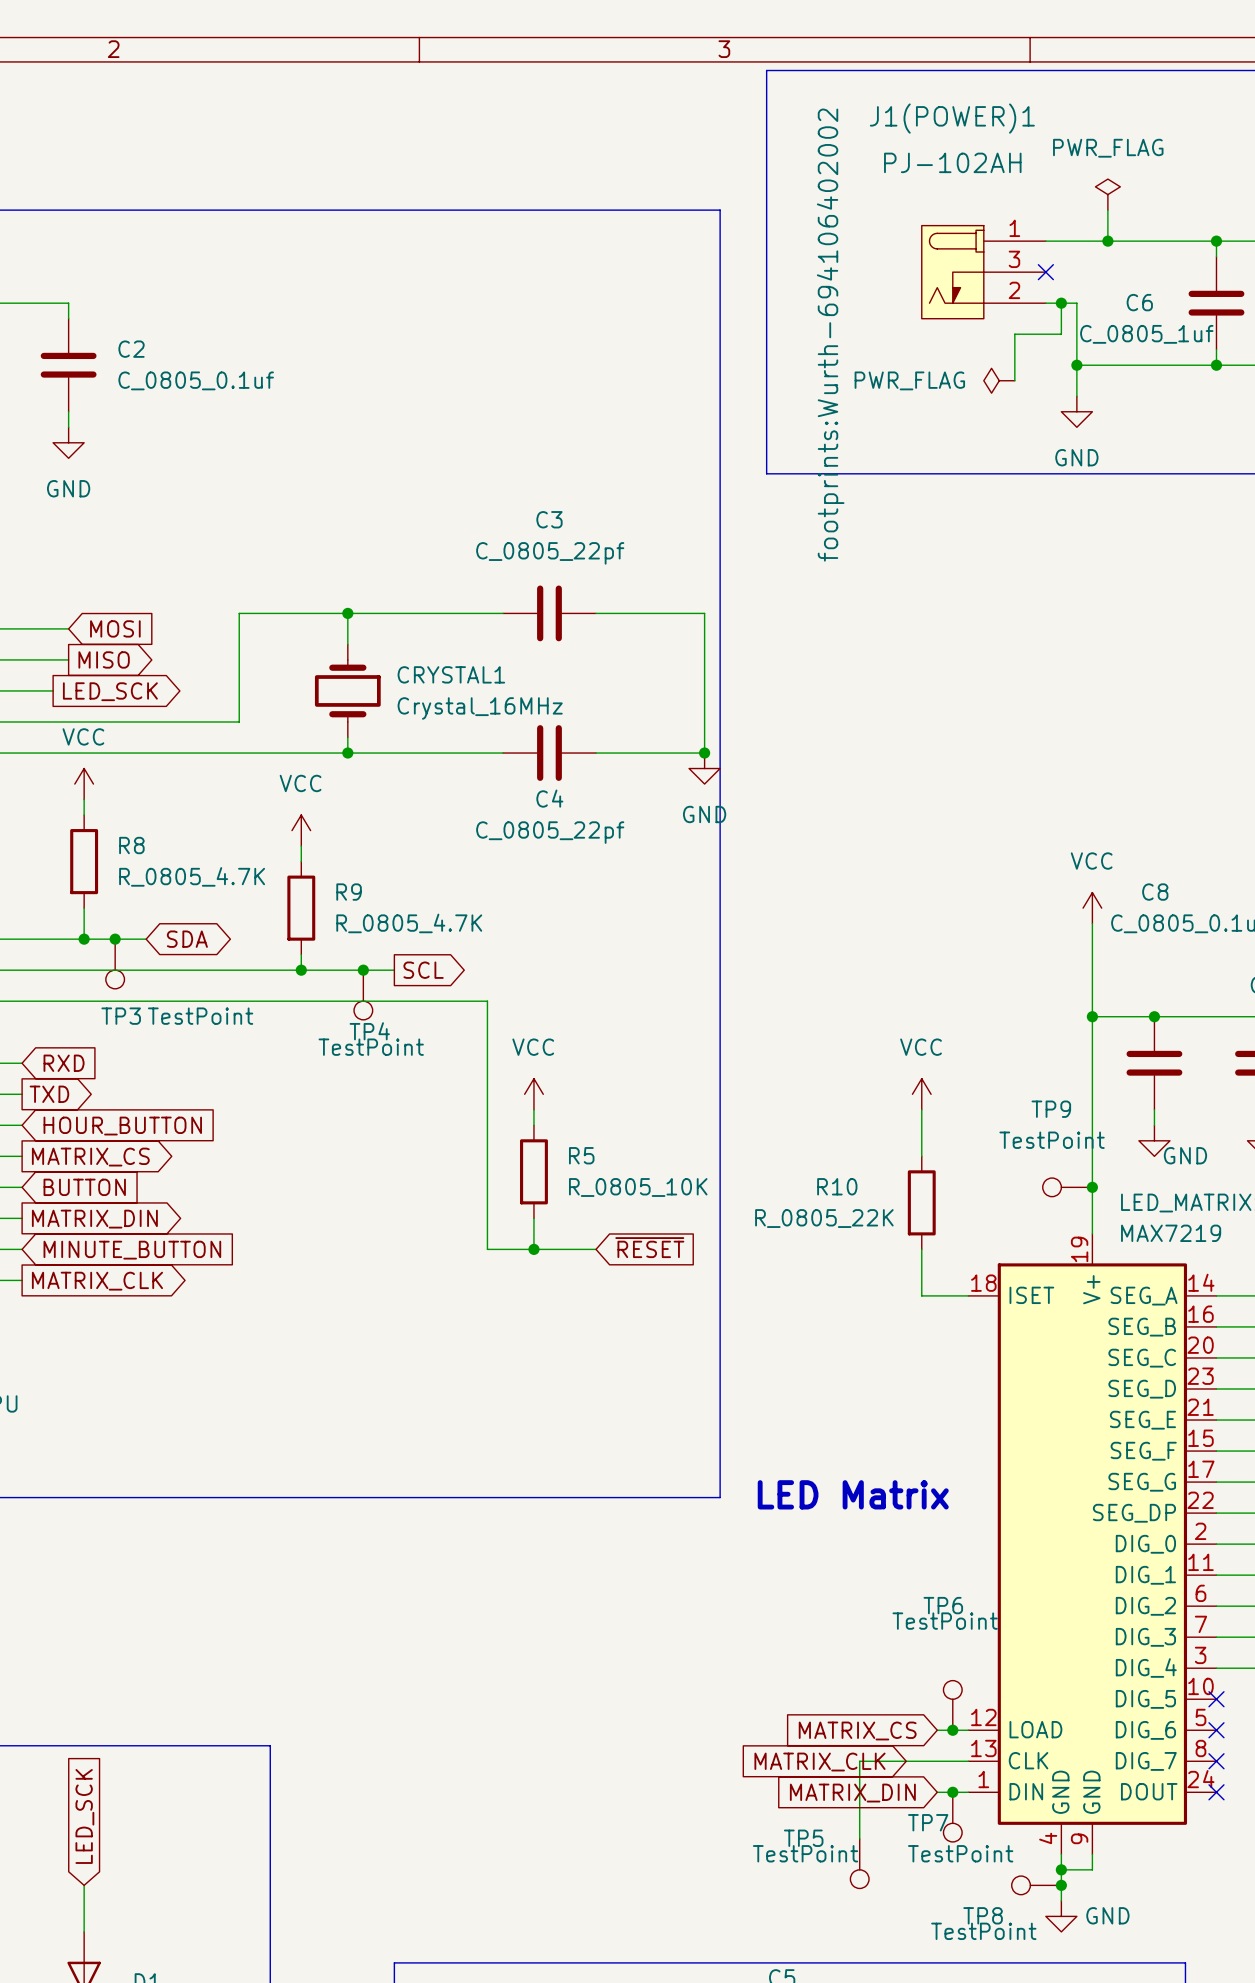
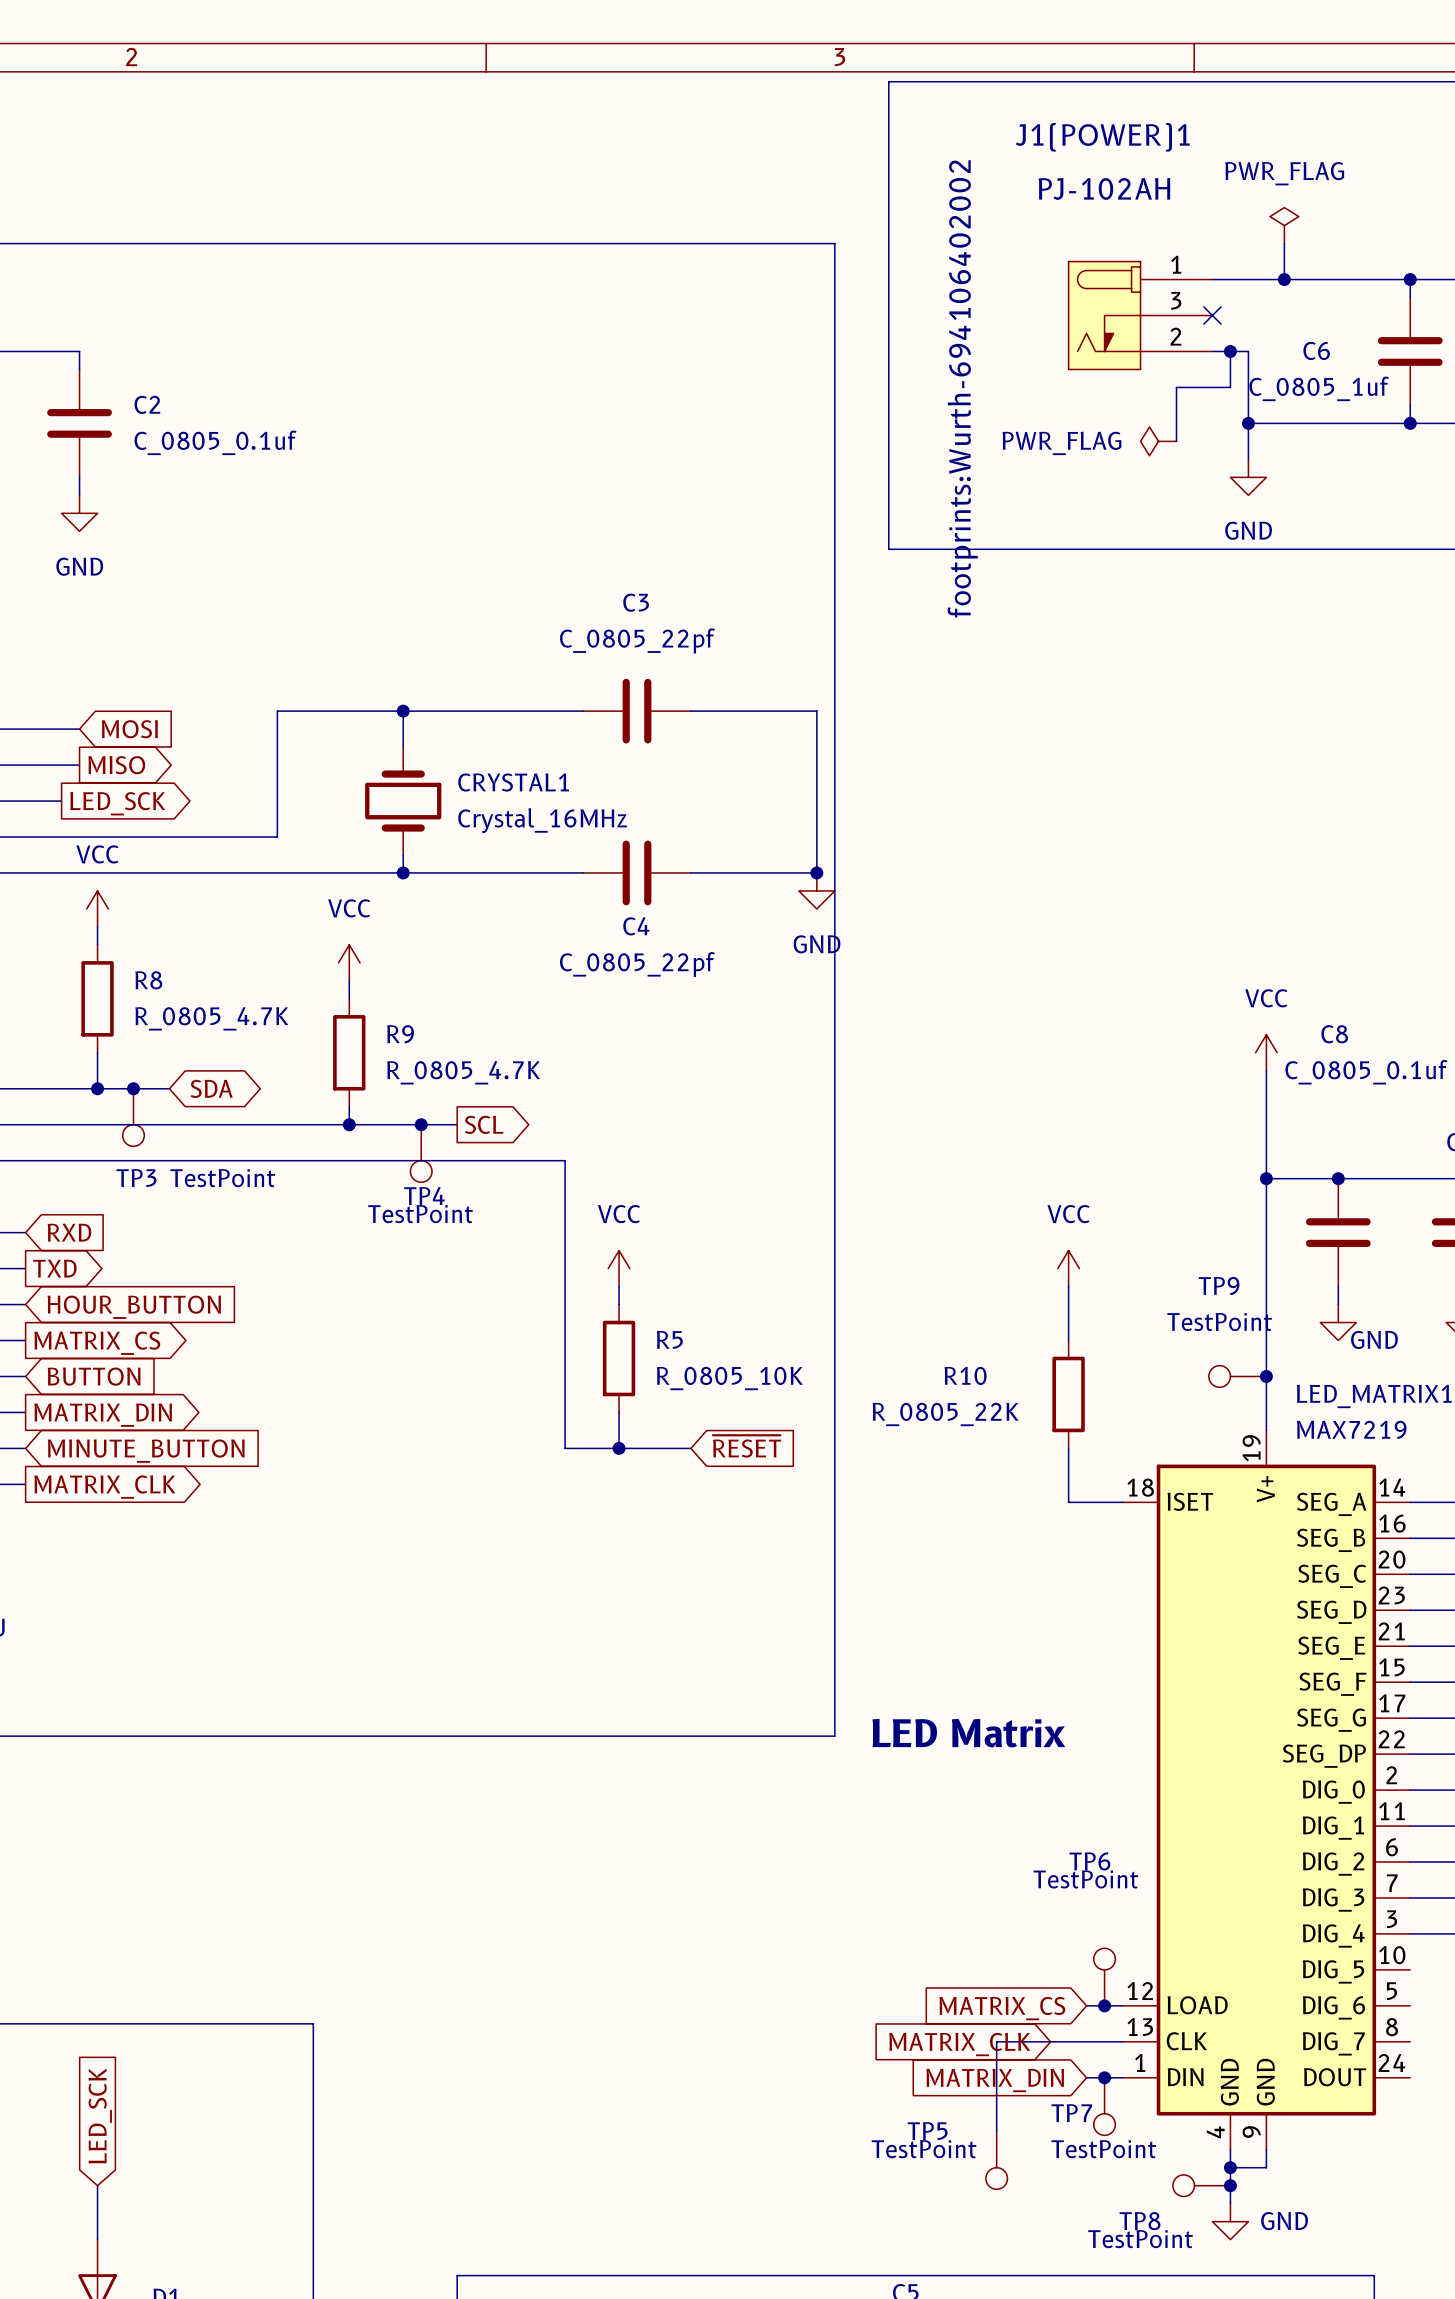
no-connect mark: (1216, 1699) -> none
no-connect mark: (1216, 1730) -> none
no-connect mark: (1216, 1761) -> none
no-connect mark: (1216, 1792) -> none

